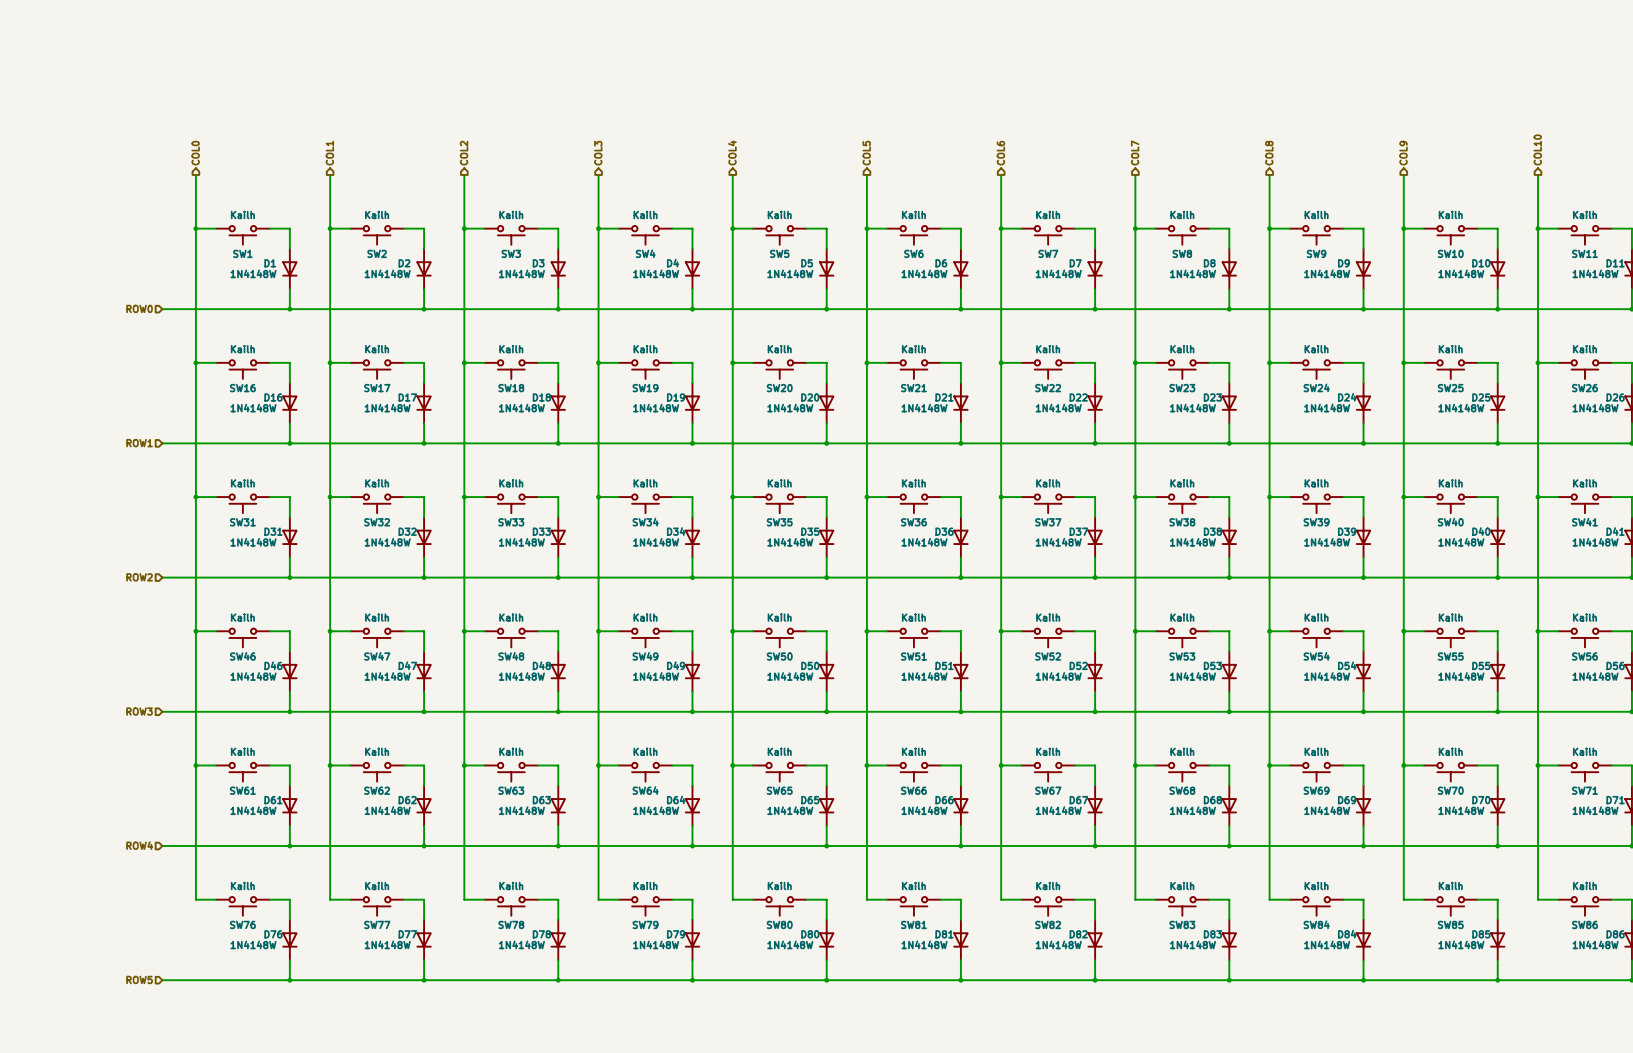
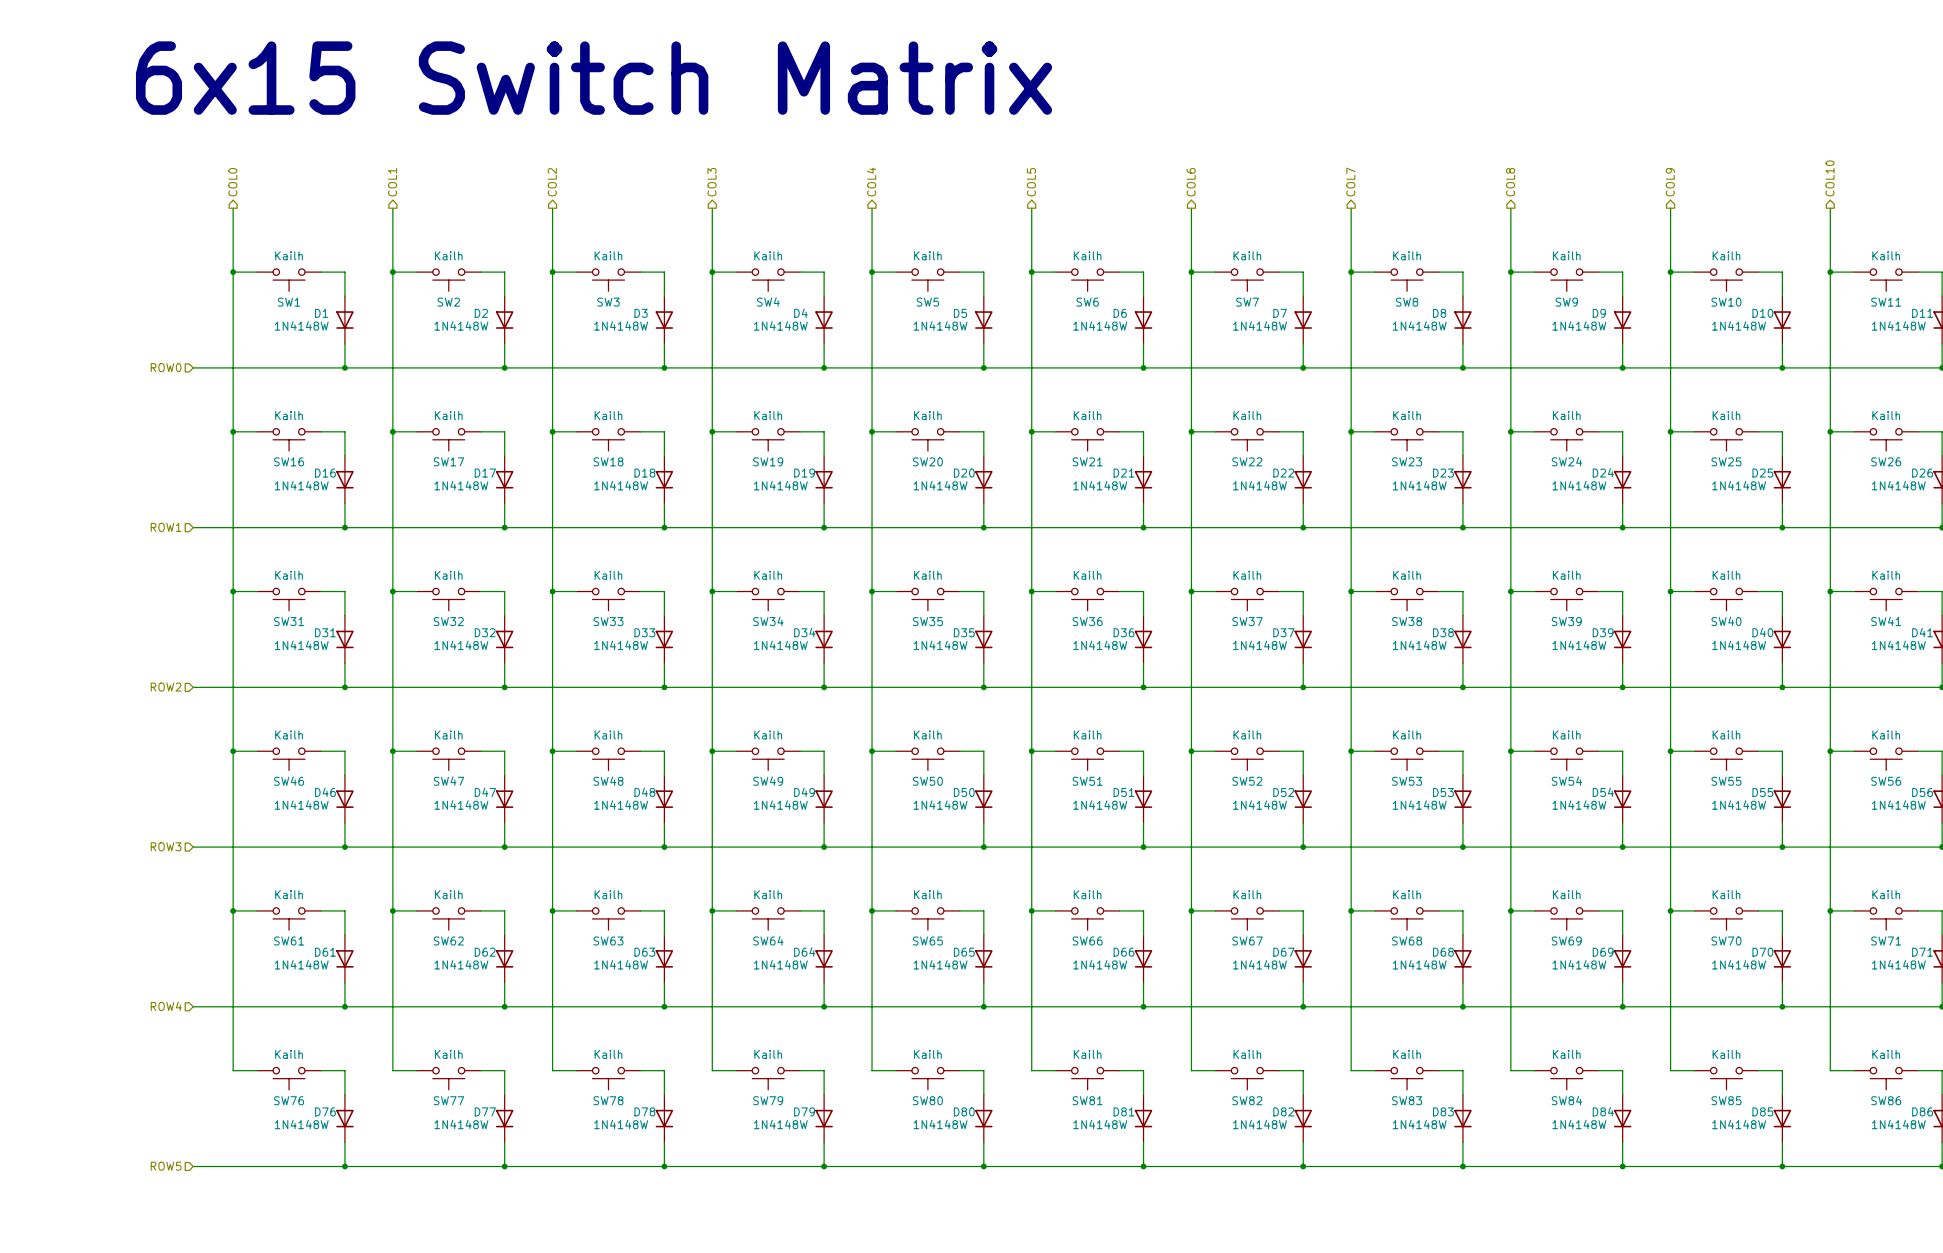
text: none -> 6x15 Switch Matrix (594, 78)

